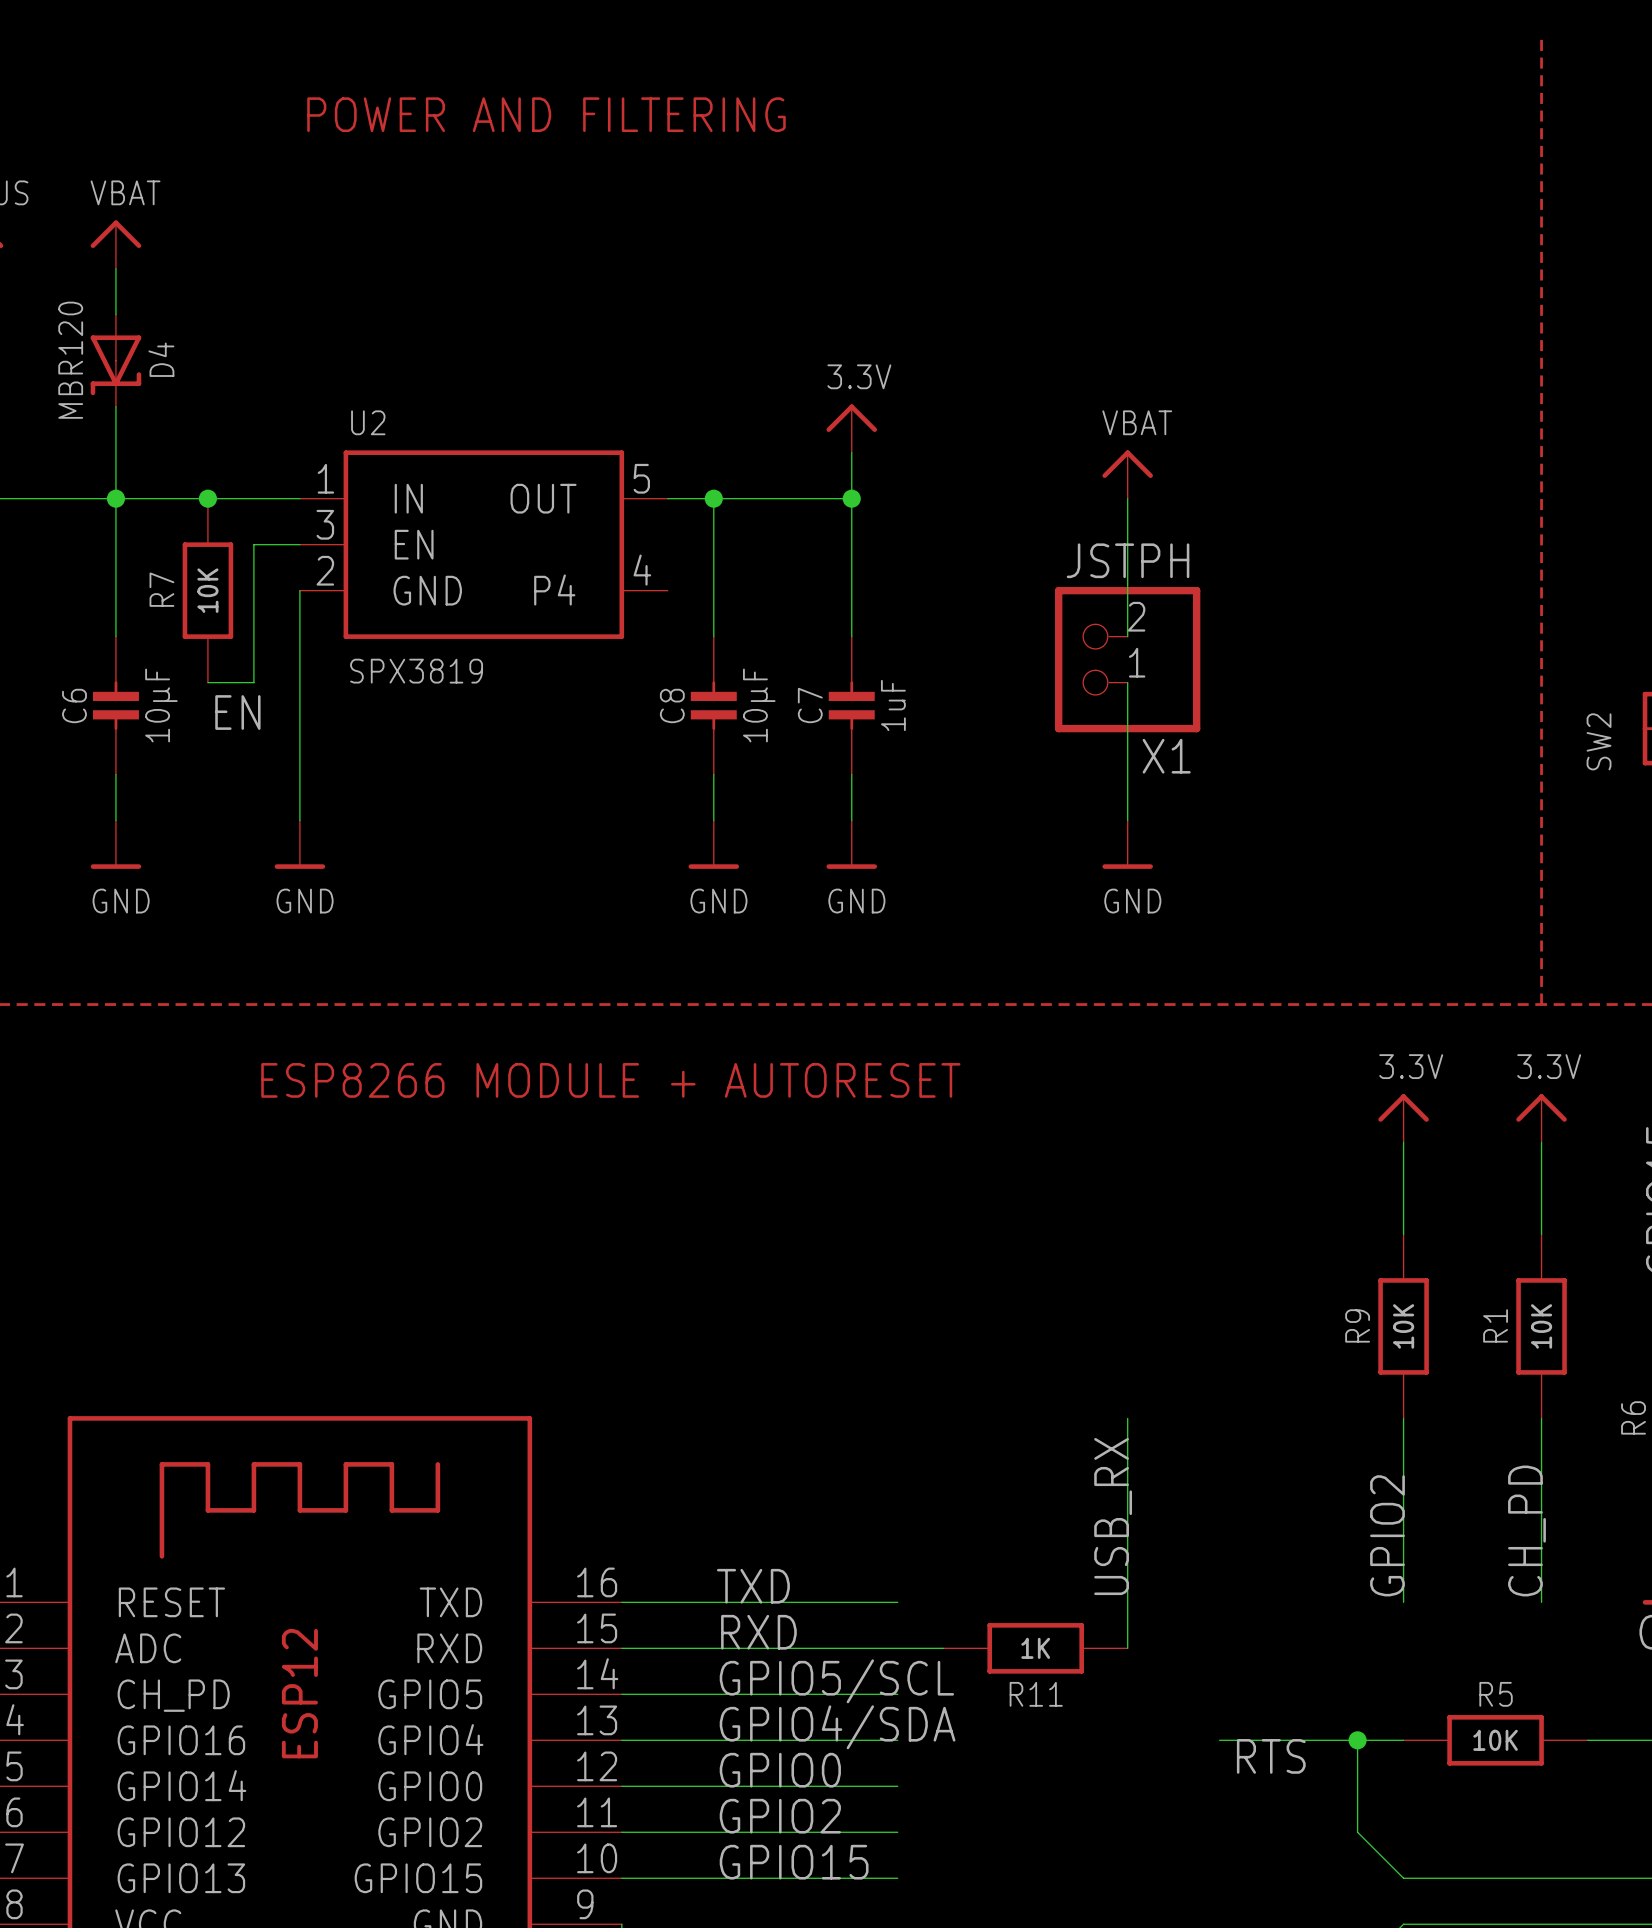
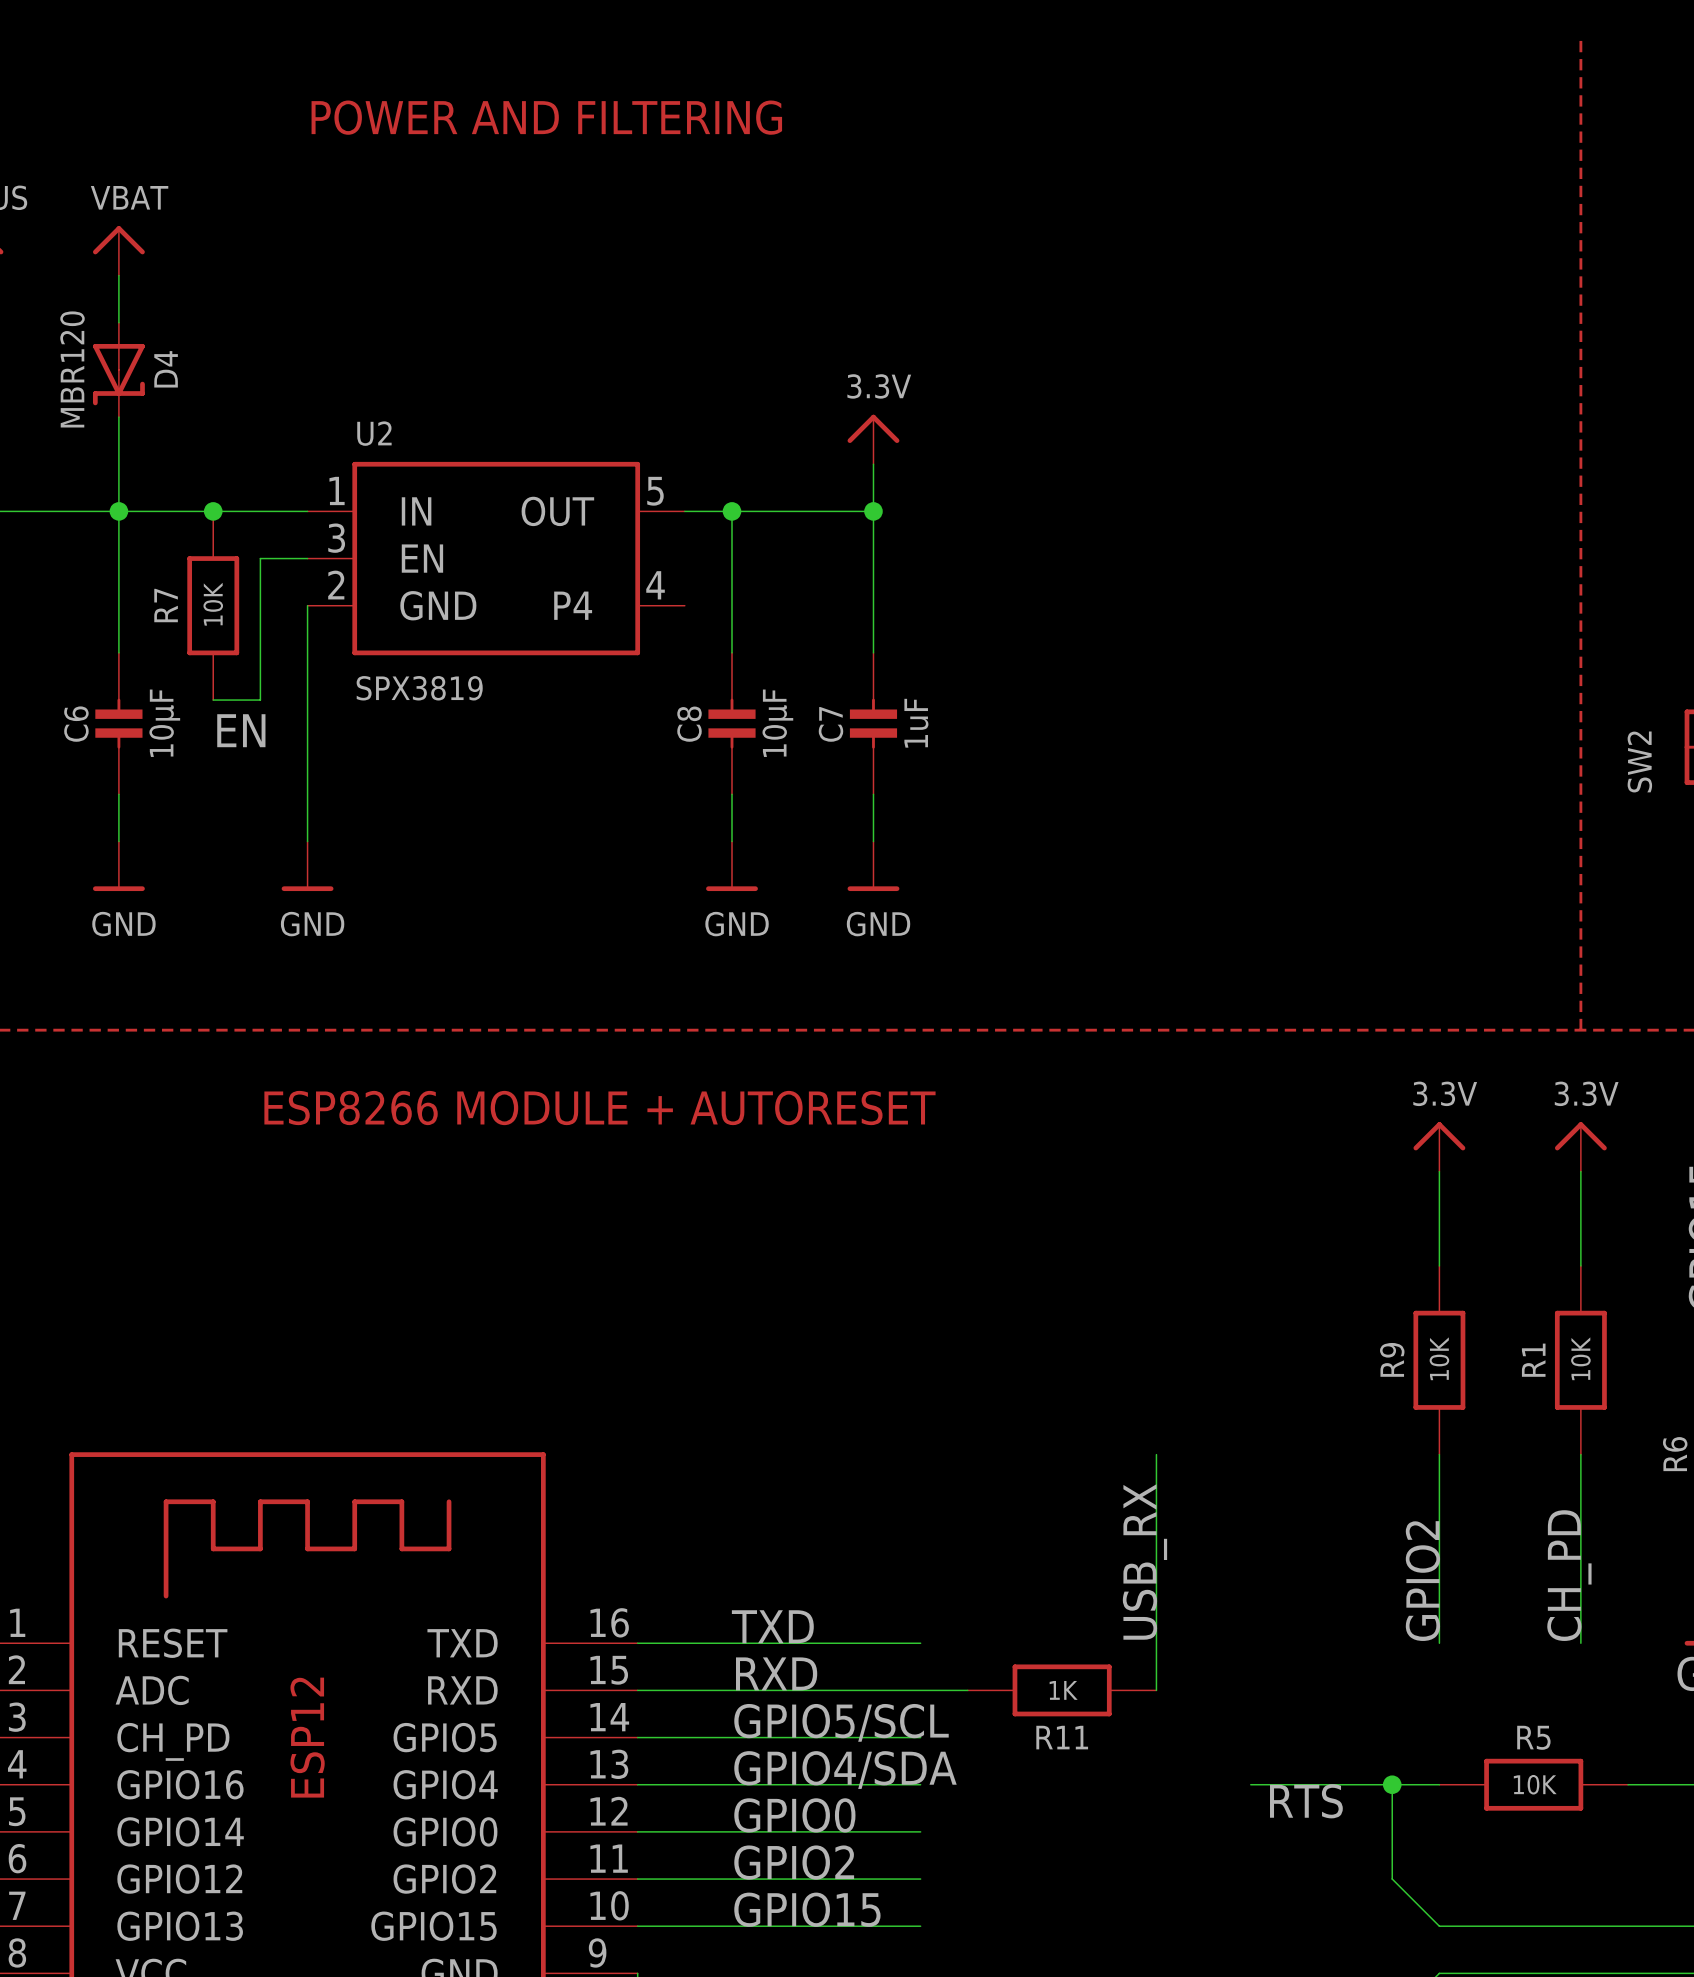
power symbol: VBAT (1127, 474) -> none
wire: (1127, 498) (1127, 636) -> none
X1: JSTPH (1127, 659) -> none
wire: (1127, 682) (1127, 820) -> none
power symbol: GND (1127, 844) -> none

